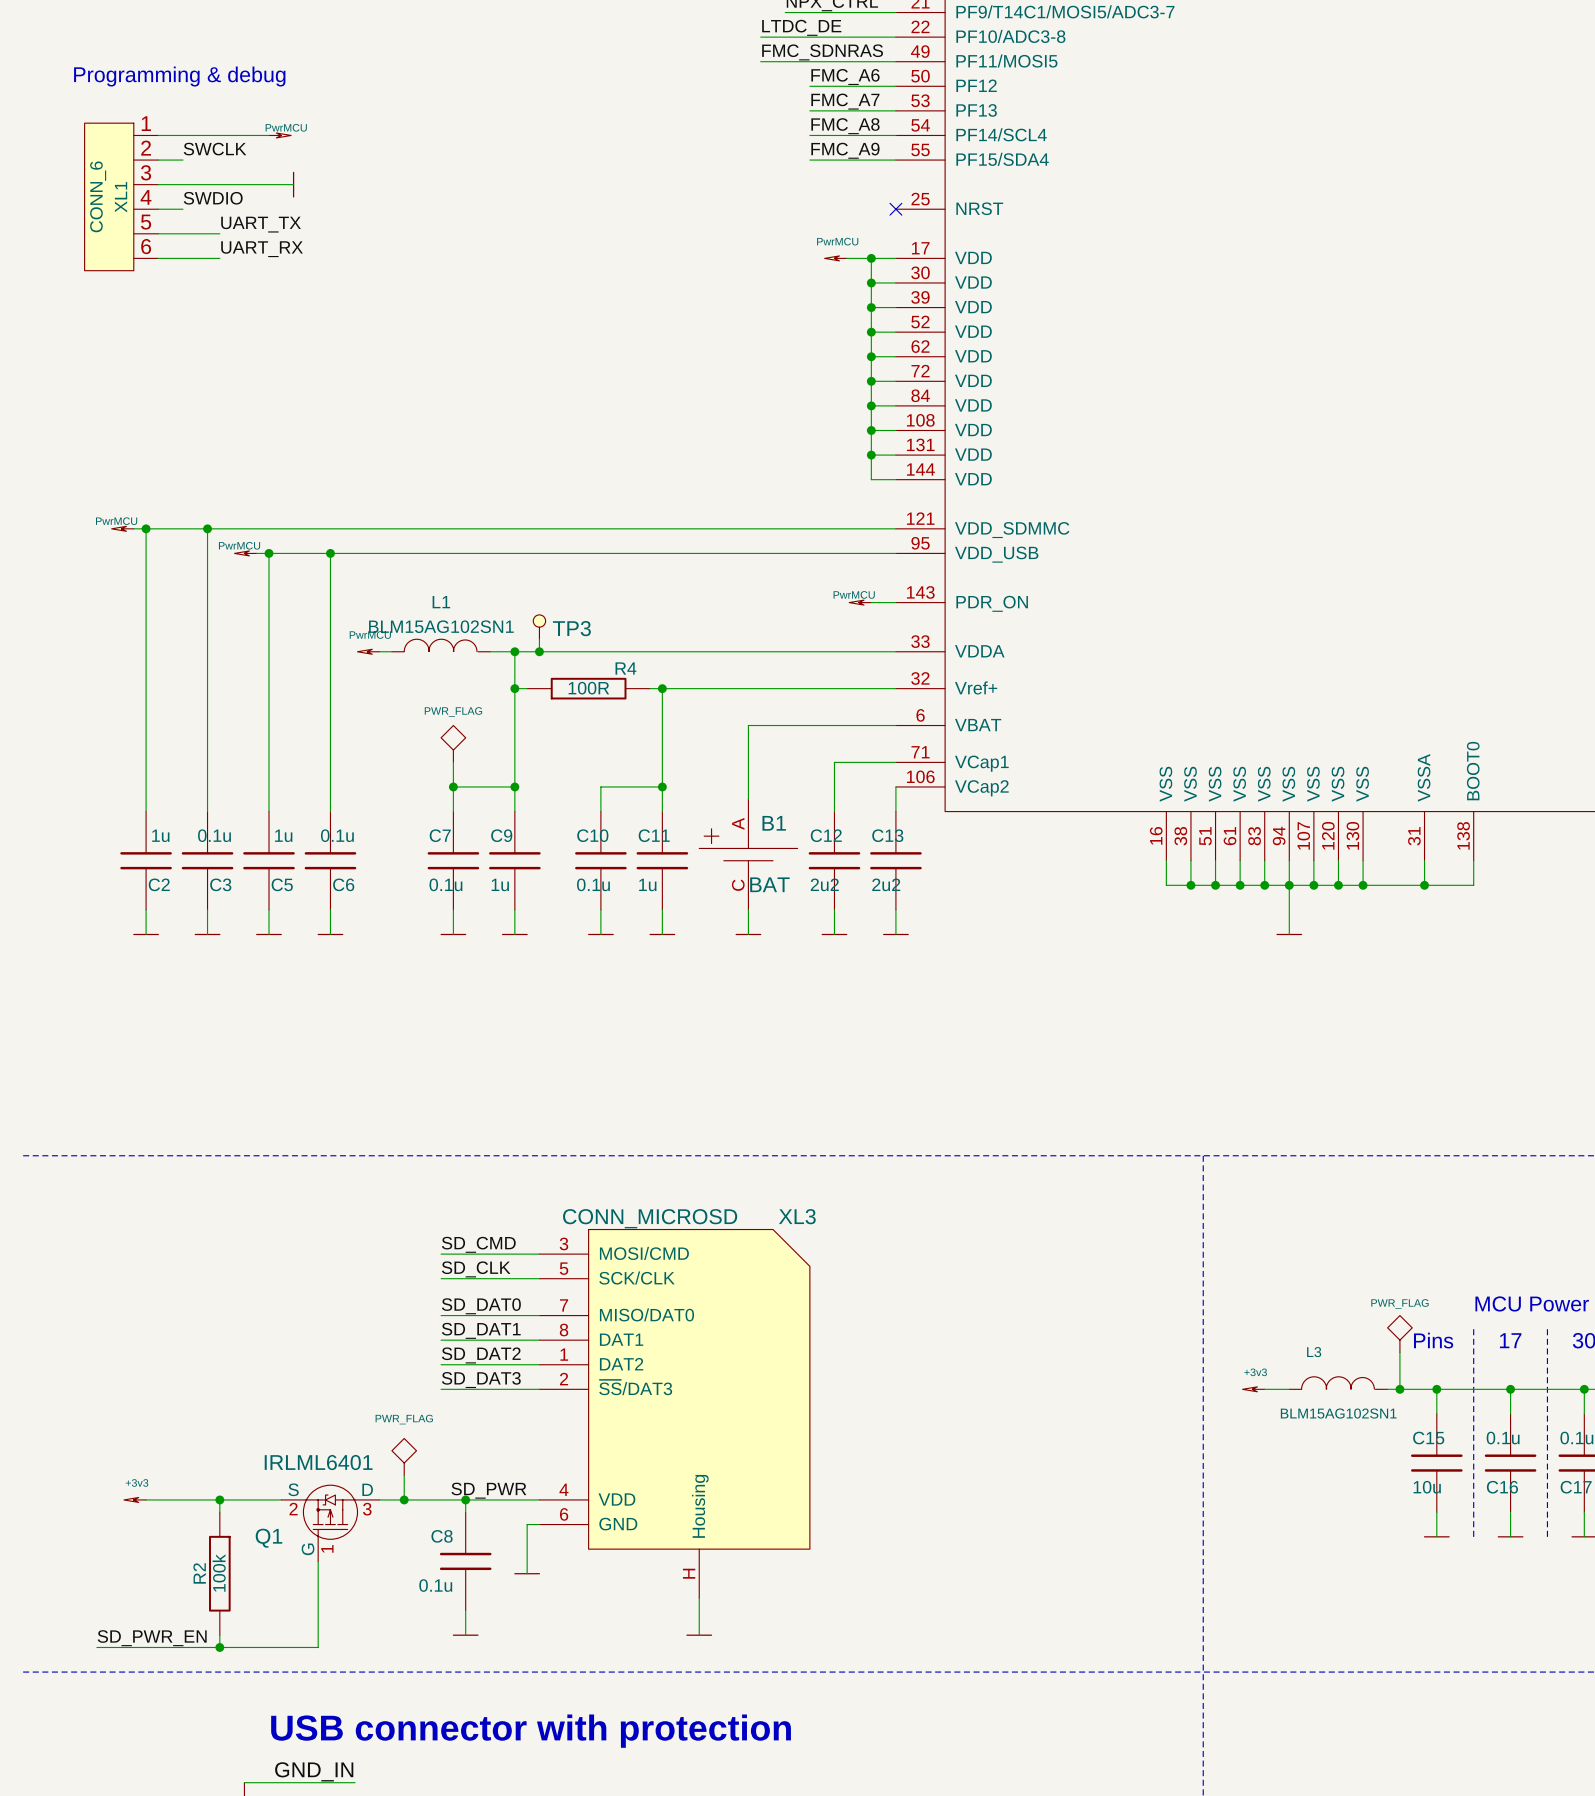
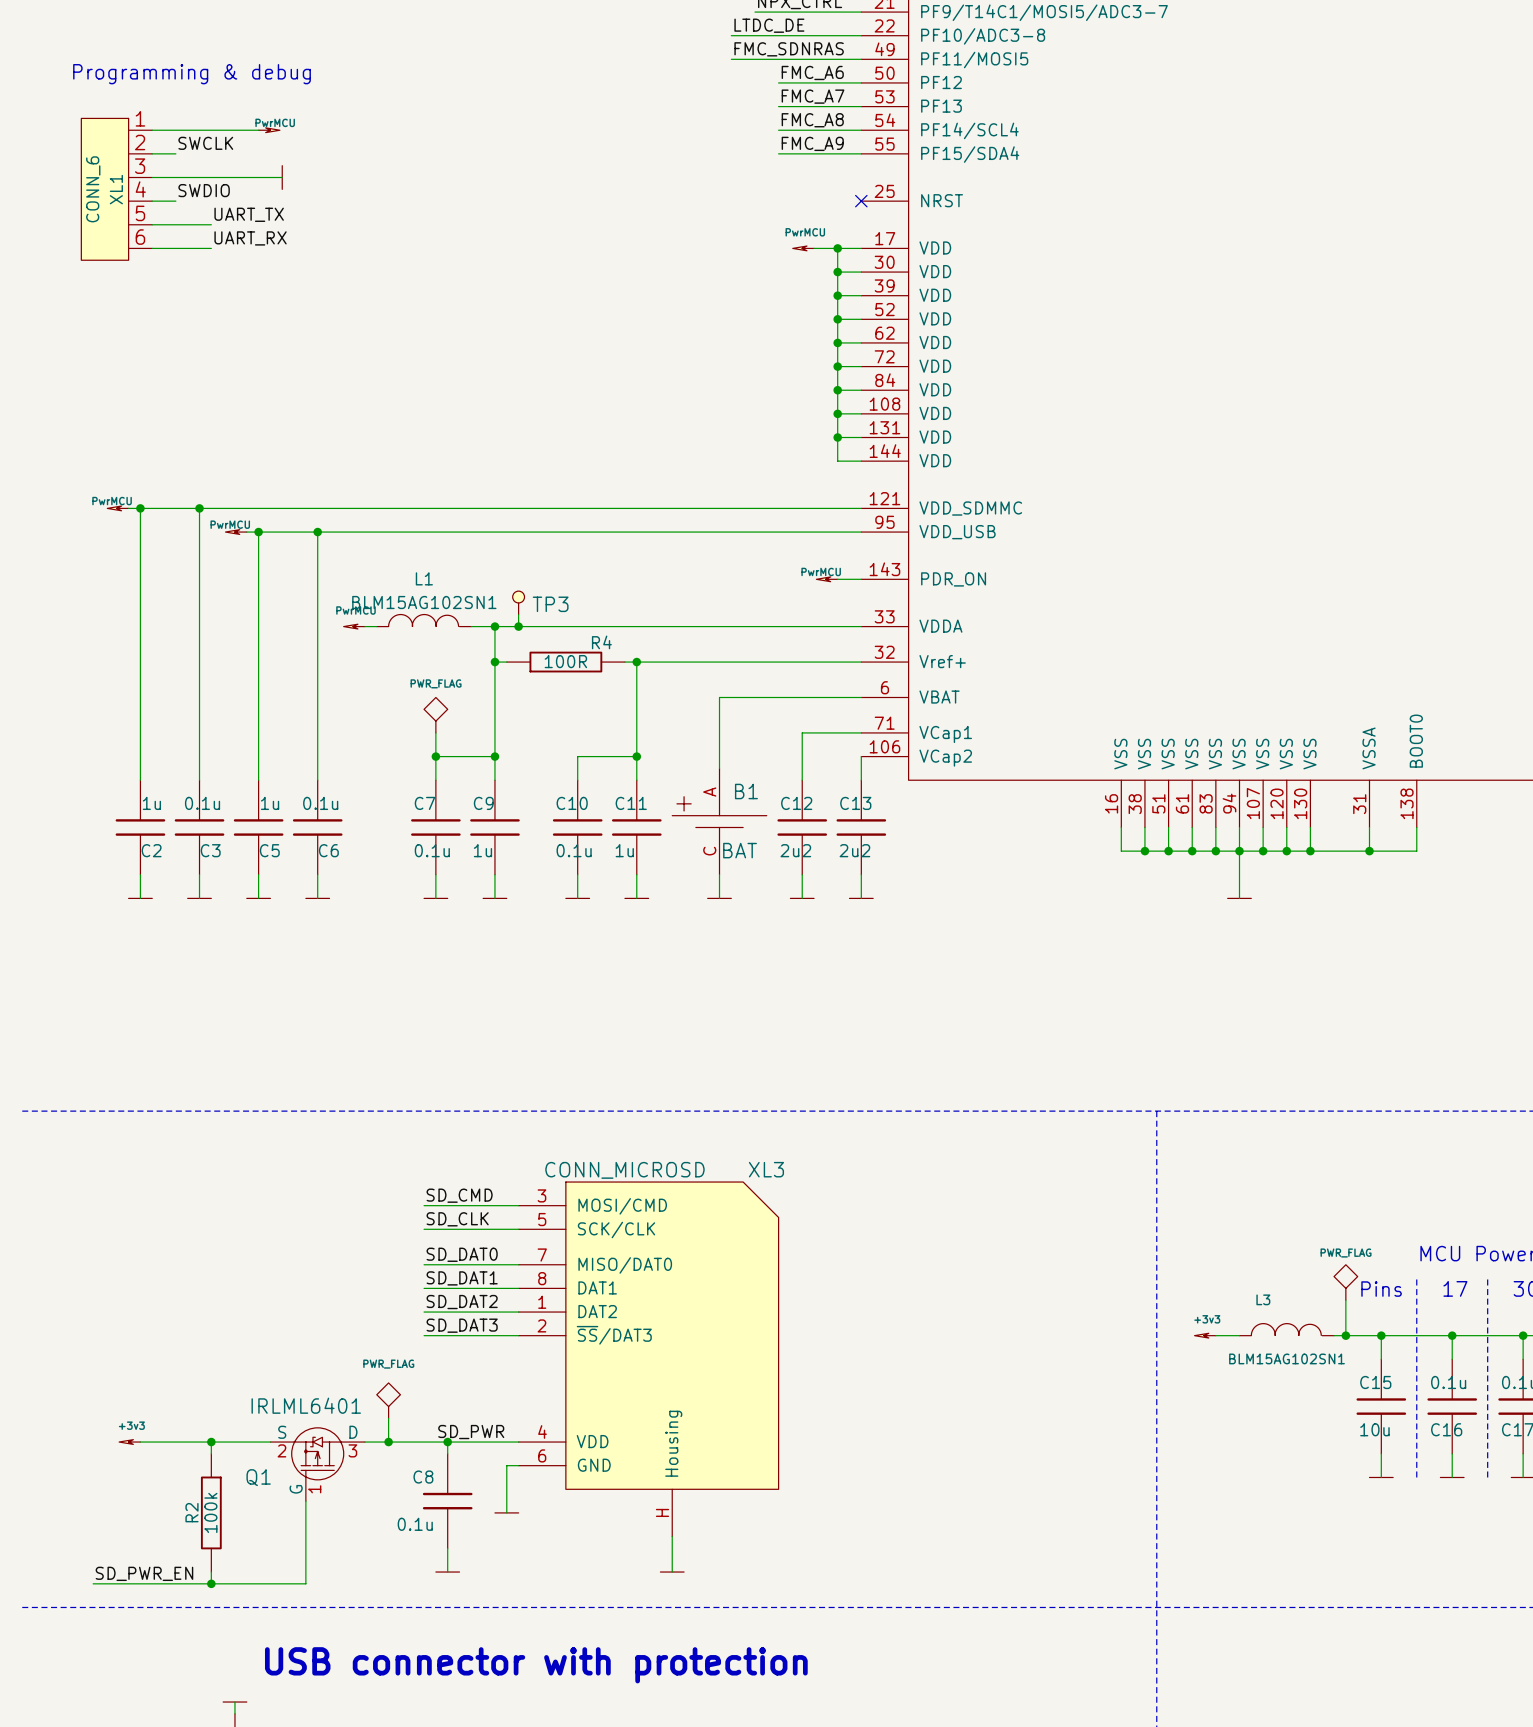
power symbol: none -> (234, 1702)
label: GND_IN (314, 1771) -> none
wire: (244, 1782) (355, 1782) -> (234, 1713) (234, 1702)

